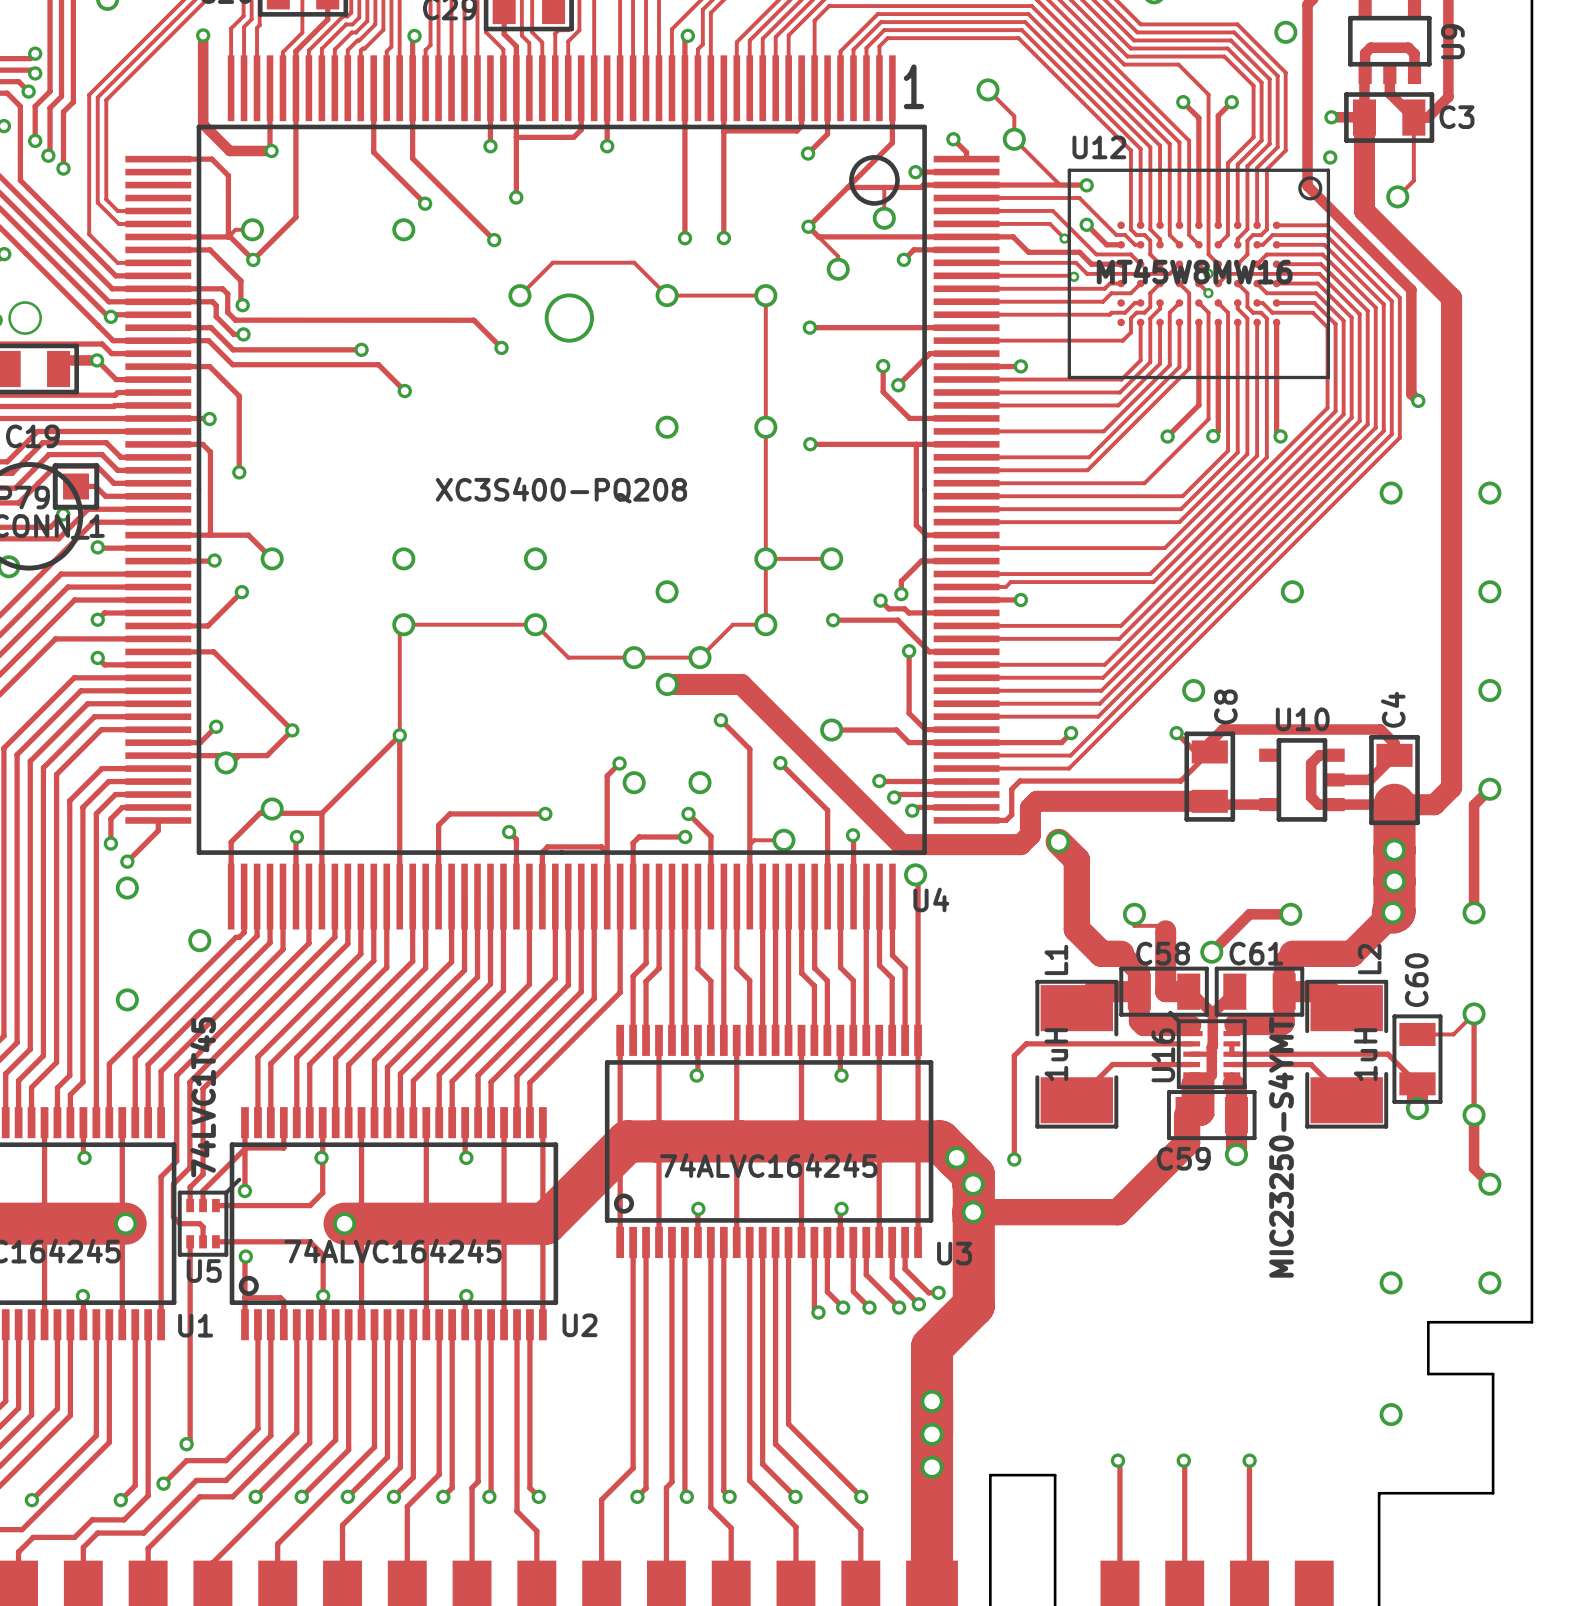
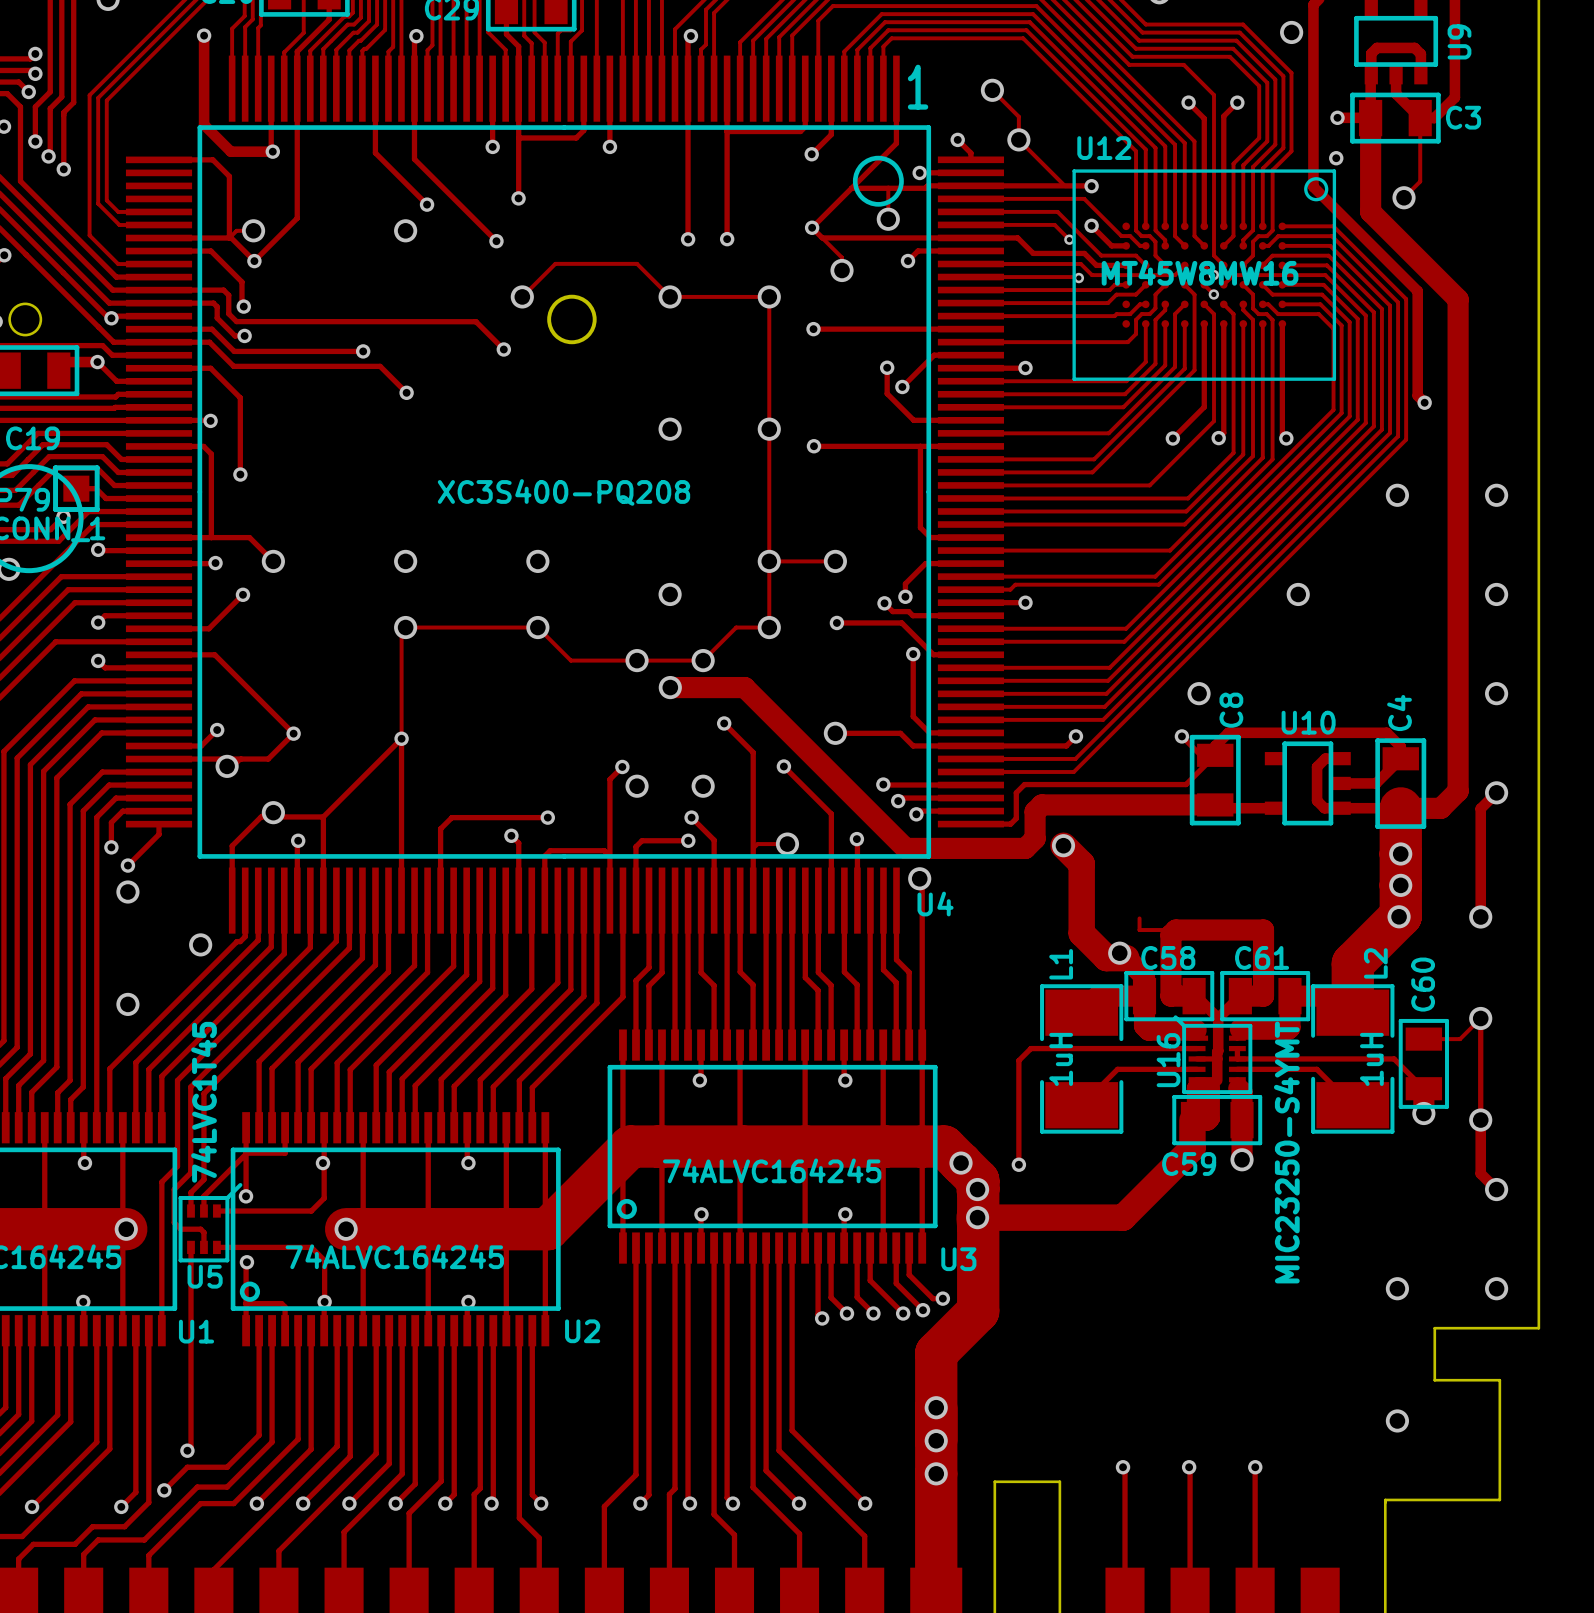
track: none -> (1400, 915) (1352, 963) (1352, 1012)
track: (1392, 912) (1351, 953) (1292, 953) (1284, 962) (1284, 991) -> none
via position: (1134, 914) -> (1119, 953)
track: (1290, 914) (1249, 914) (1211, 952) -> none
via: (1290, 914) -> none
track: none -> (1170, 934) (1175, 930) (1263, 930) (1263, 996) (1240, 996)
via: (1211, 952) -> none

